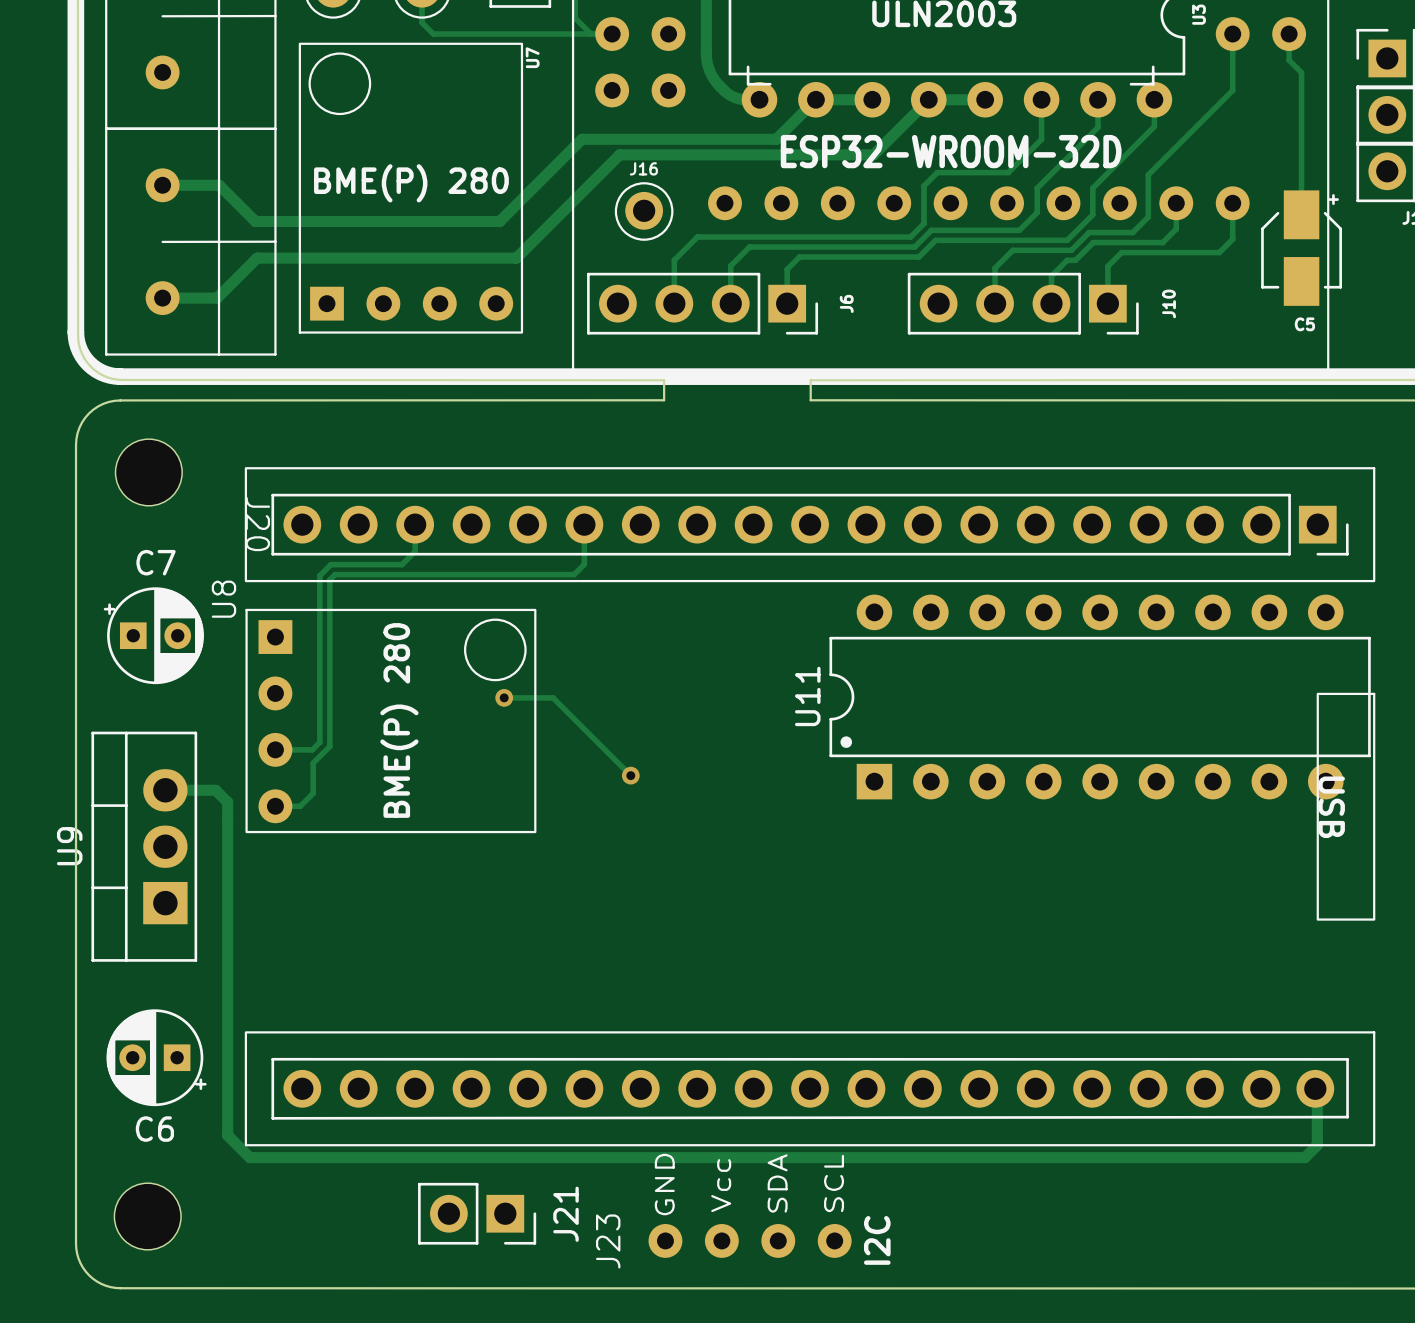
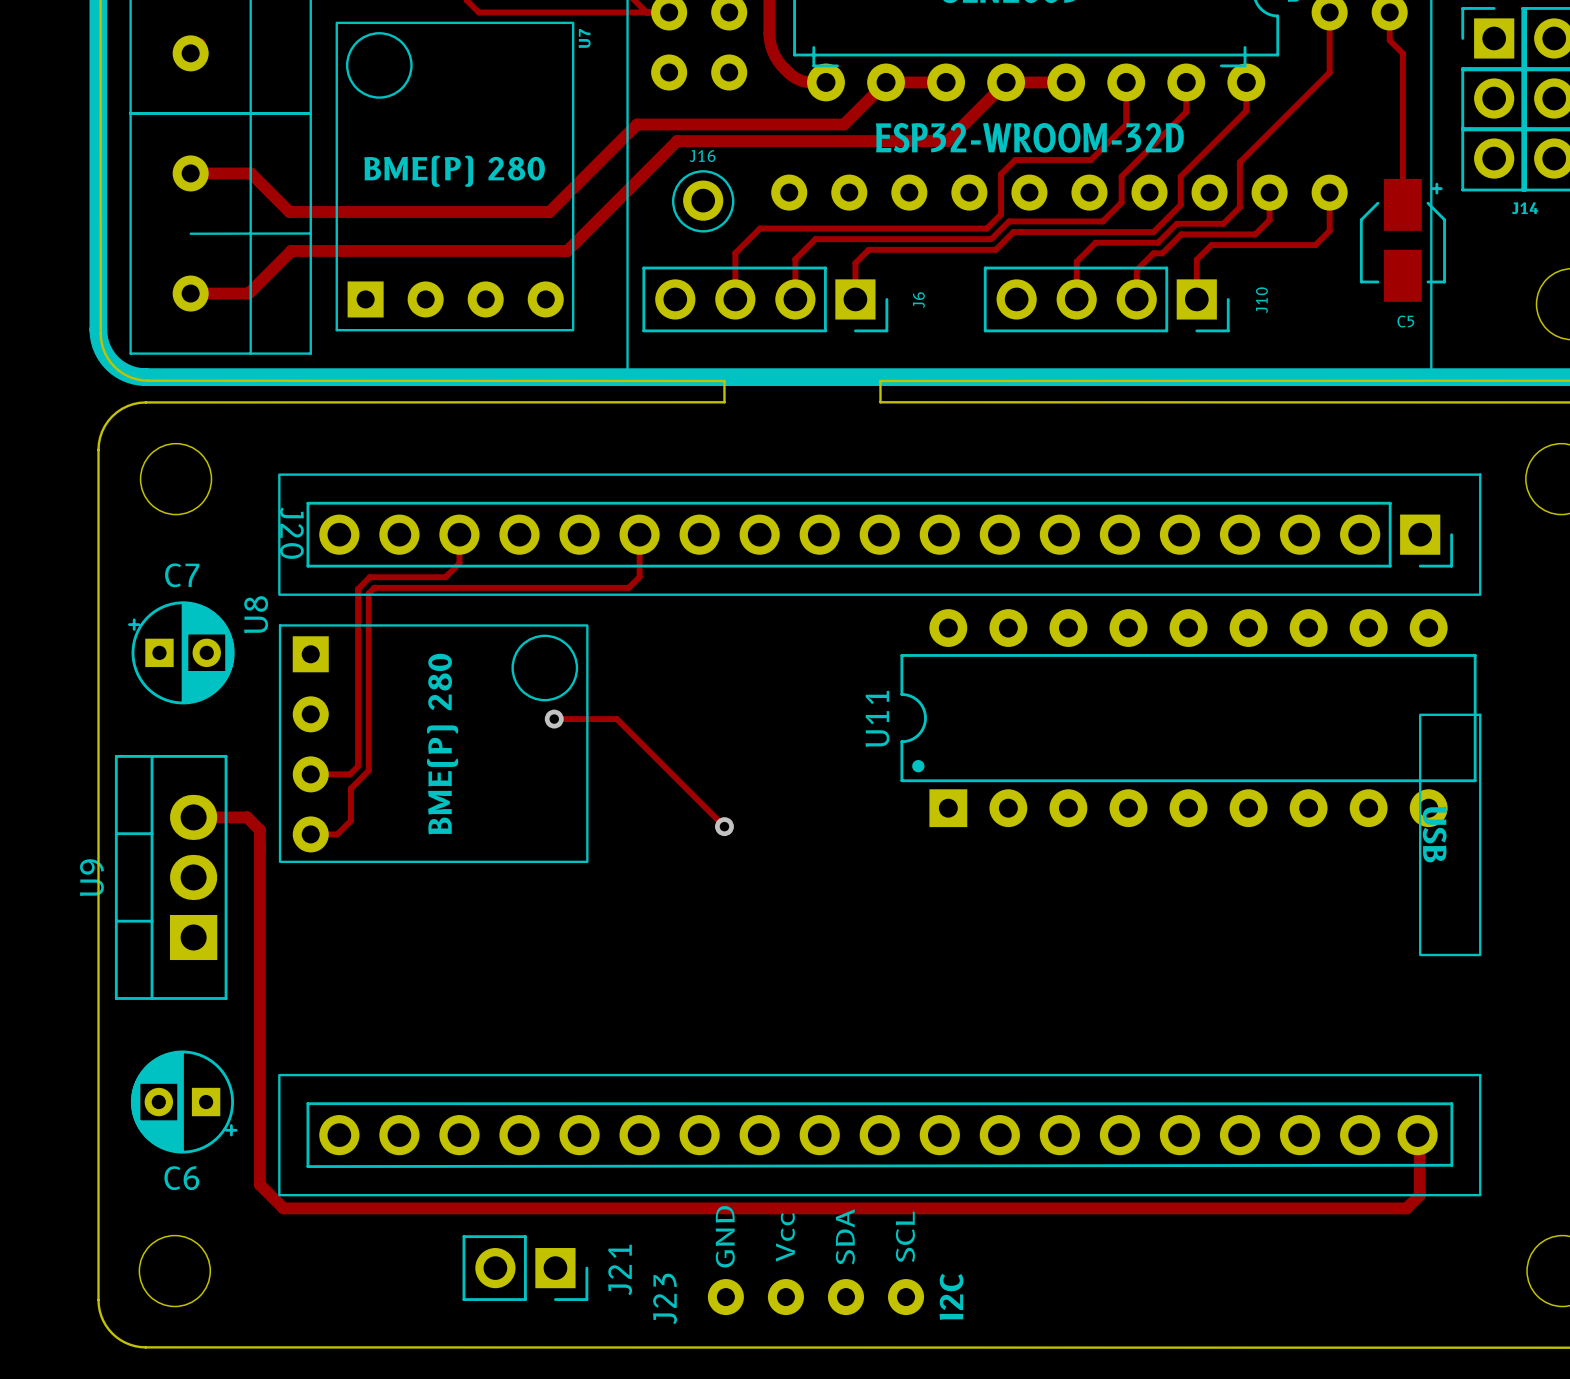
track: (553, 697) (630, 775) -> (606, 719) (616, 719) (724, 826)
via position: (630, 775) -> (724, 826)

